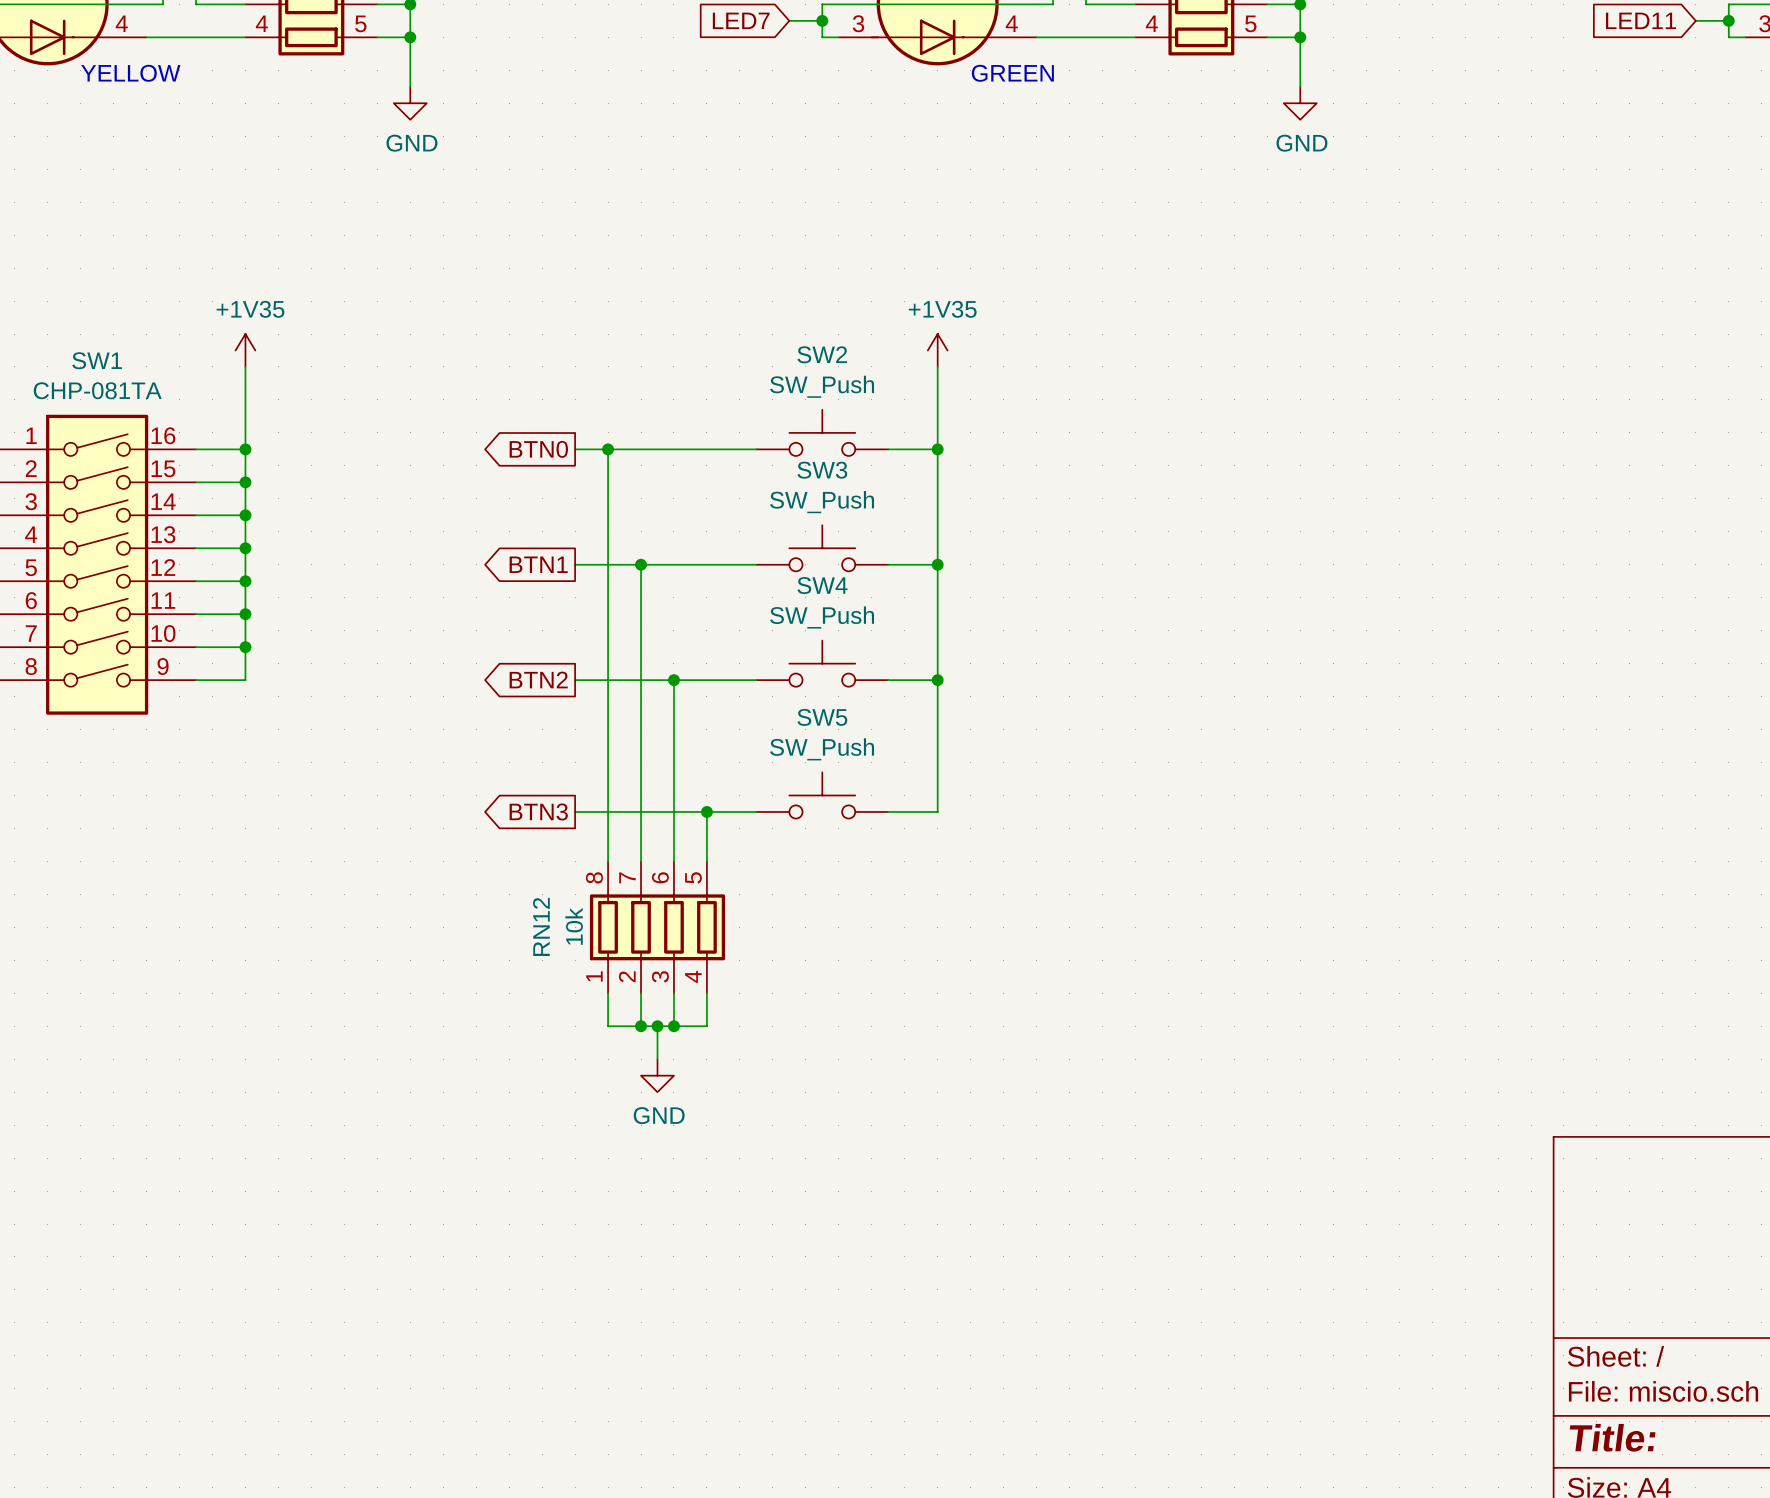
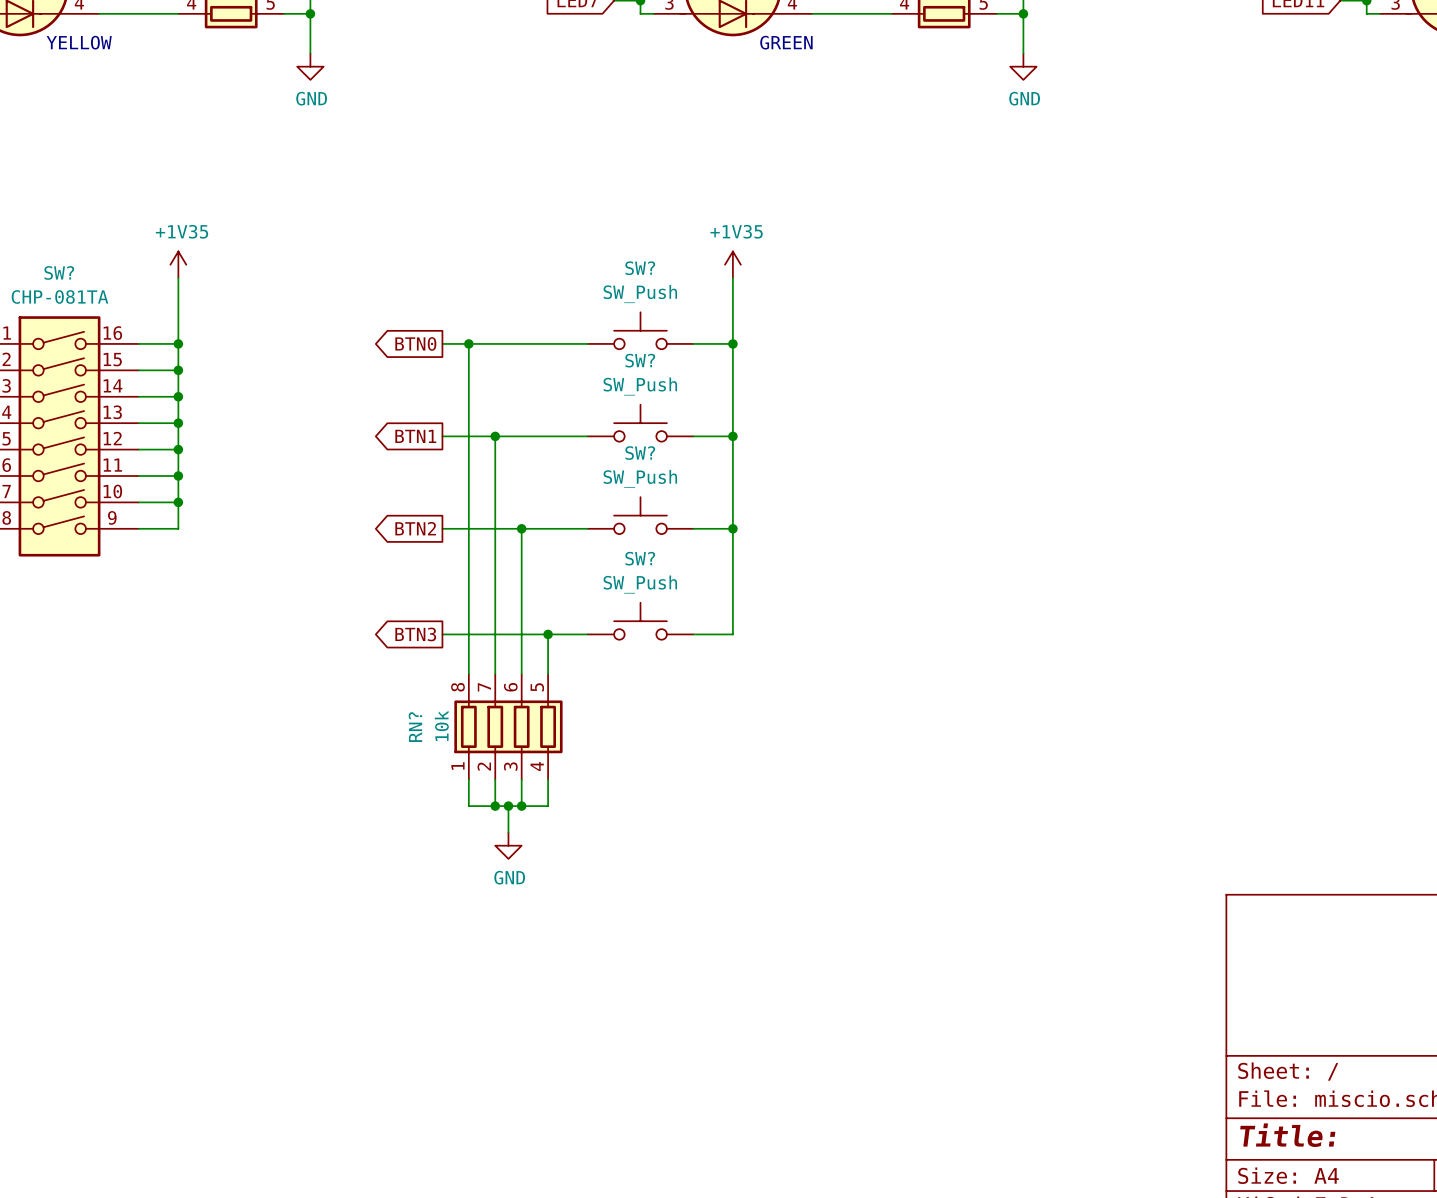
SW2 name: SW2 (822, 354) -> SW? (640, 268)
SW1 name: SW1 (97, 360) -> SW? (59, 272)
SW3 name: SW3 (822, 470) -> SW? (640, 360)
SW4 name: SW4 (822, 585) -> SW? (640, 453)
SW5 name: SW5 (822, 717) -> SW? (640, 558)
RN12 name: RN12 (541, 926) -> RN? (415, 727)

